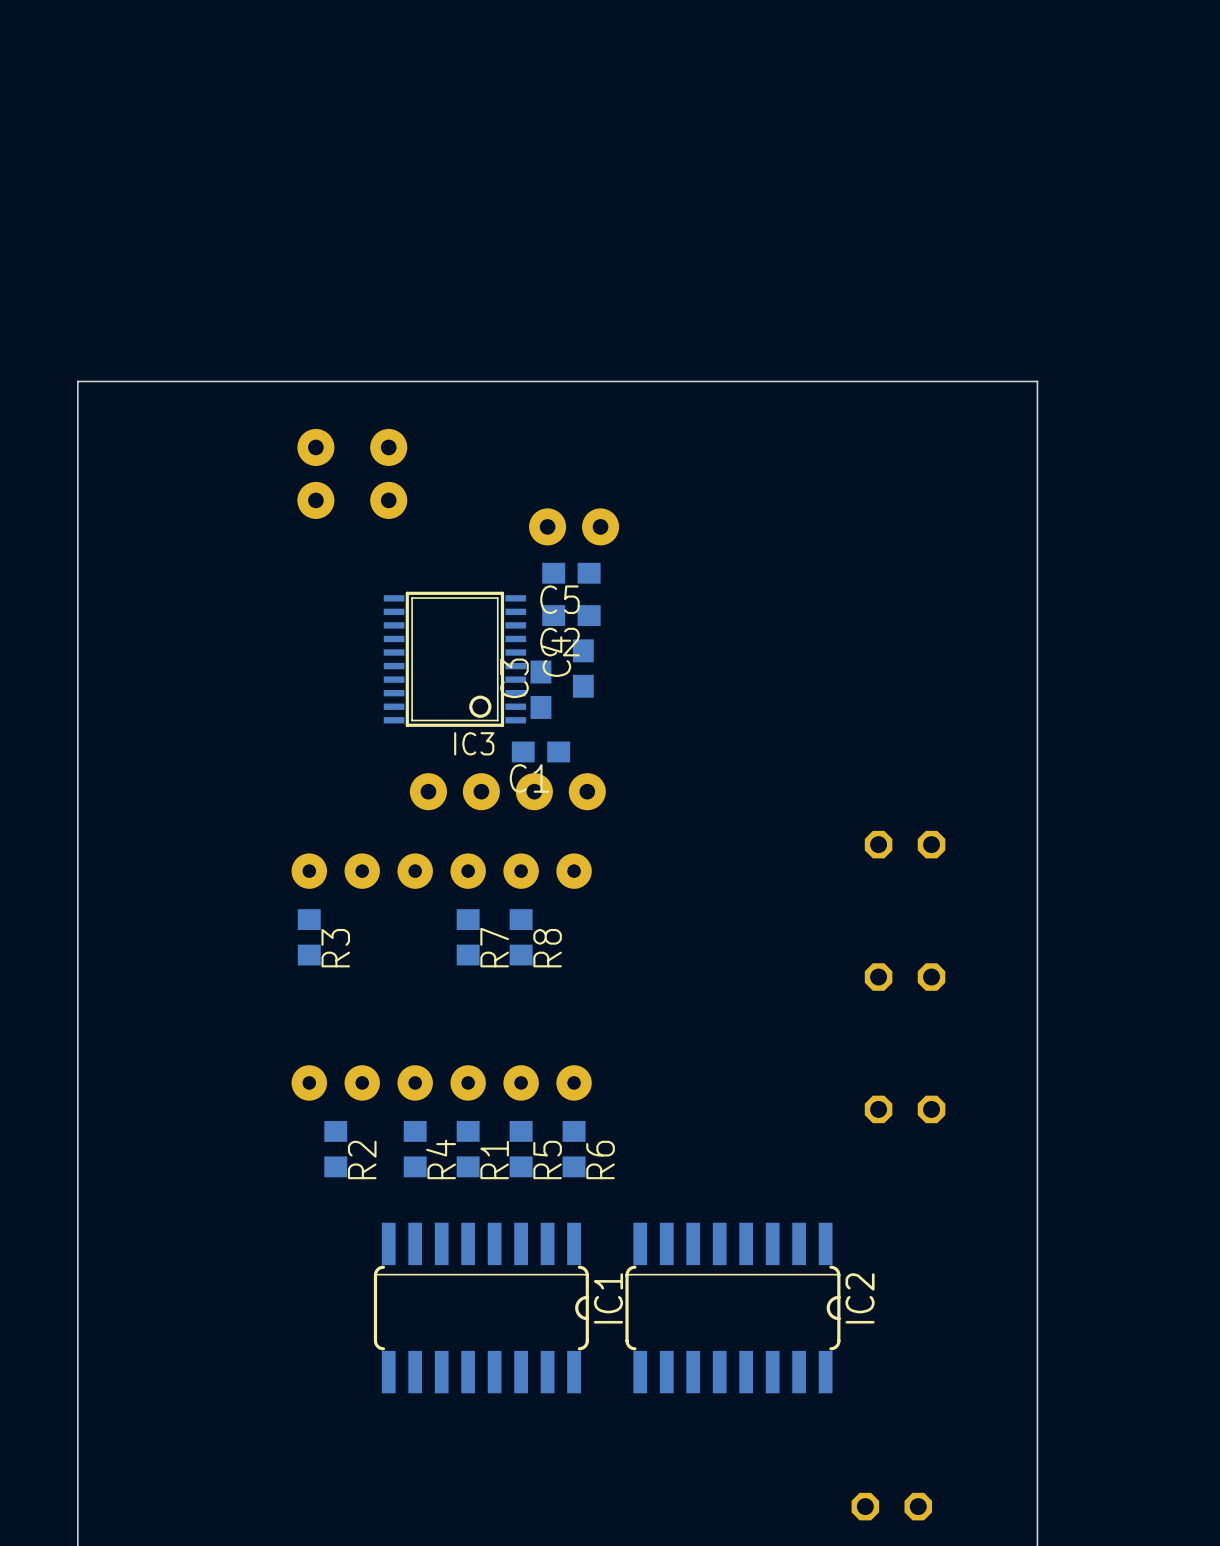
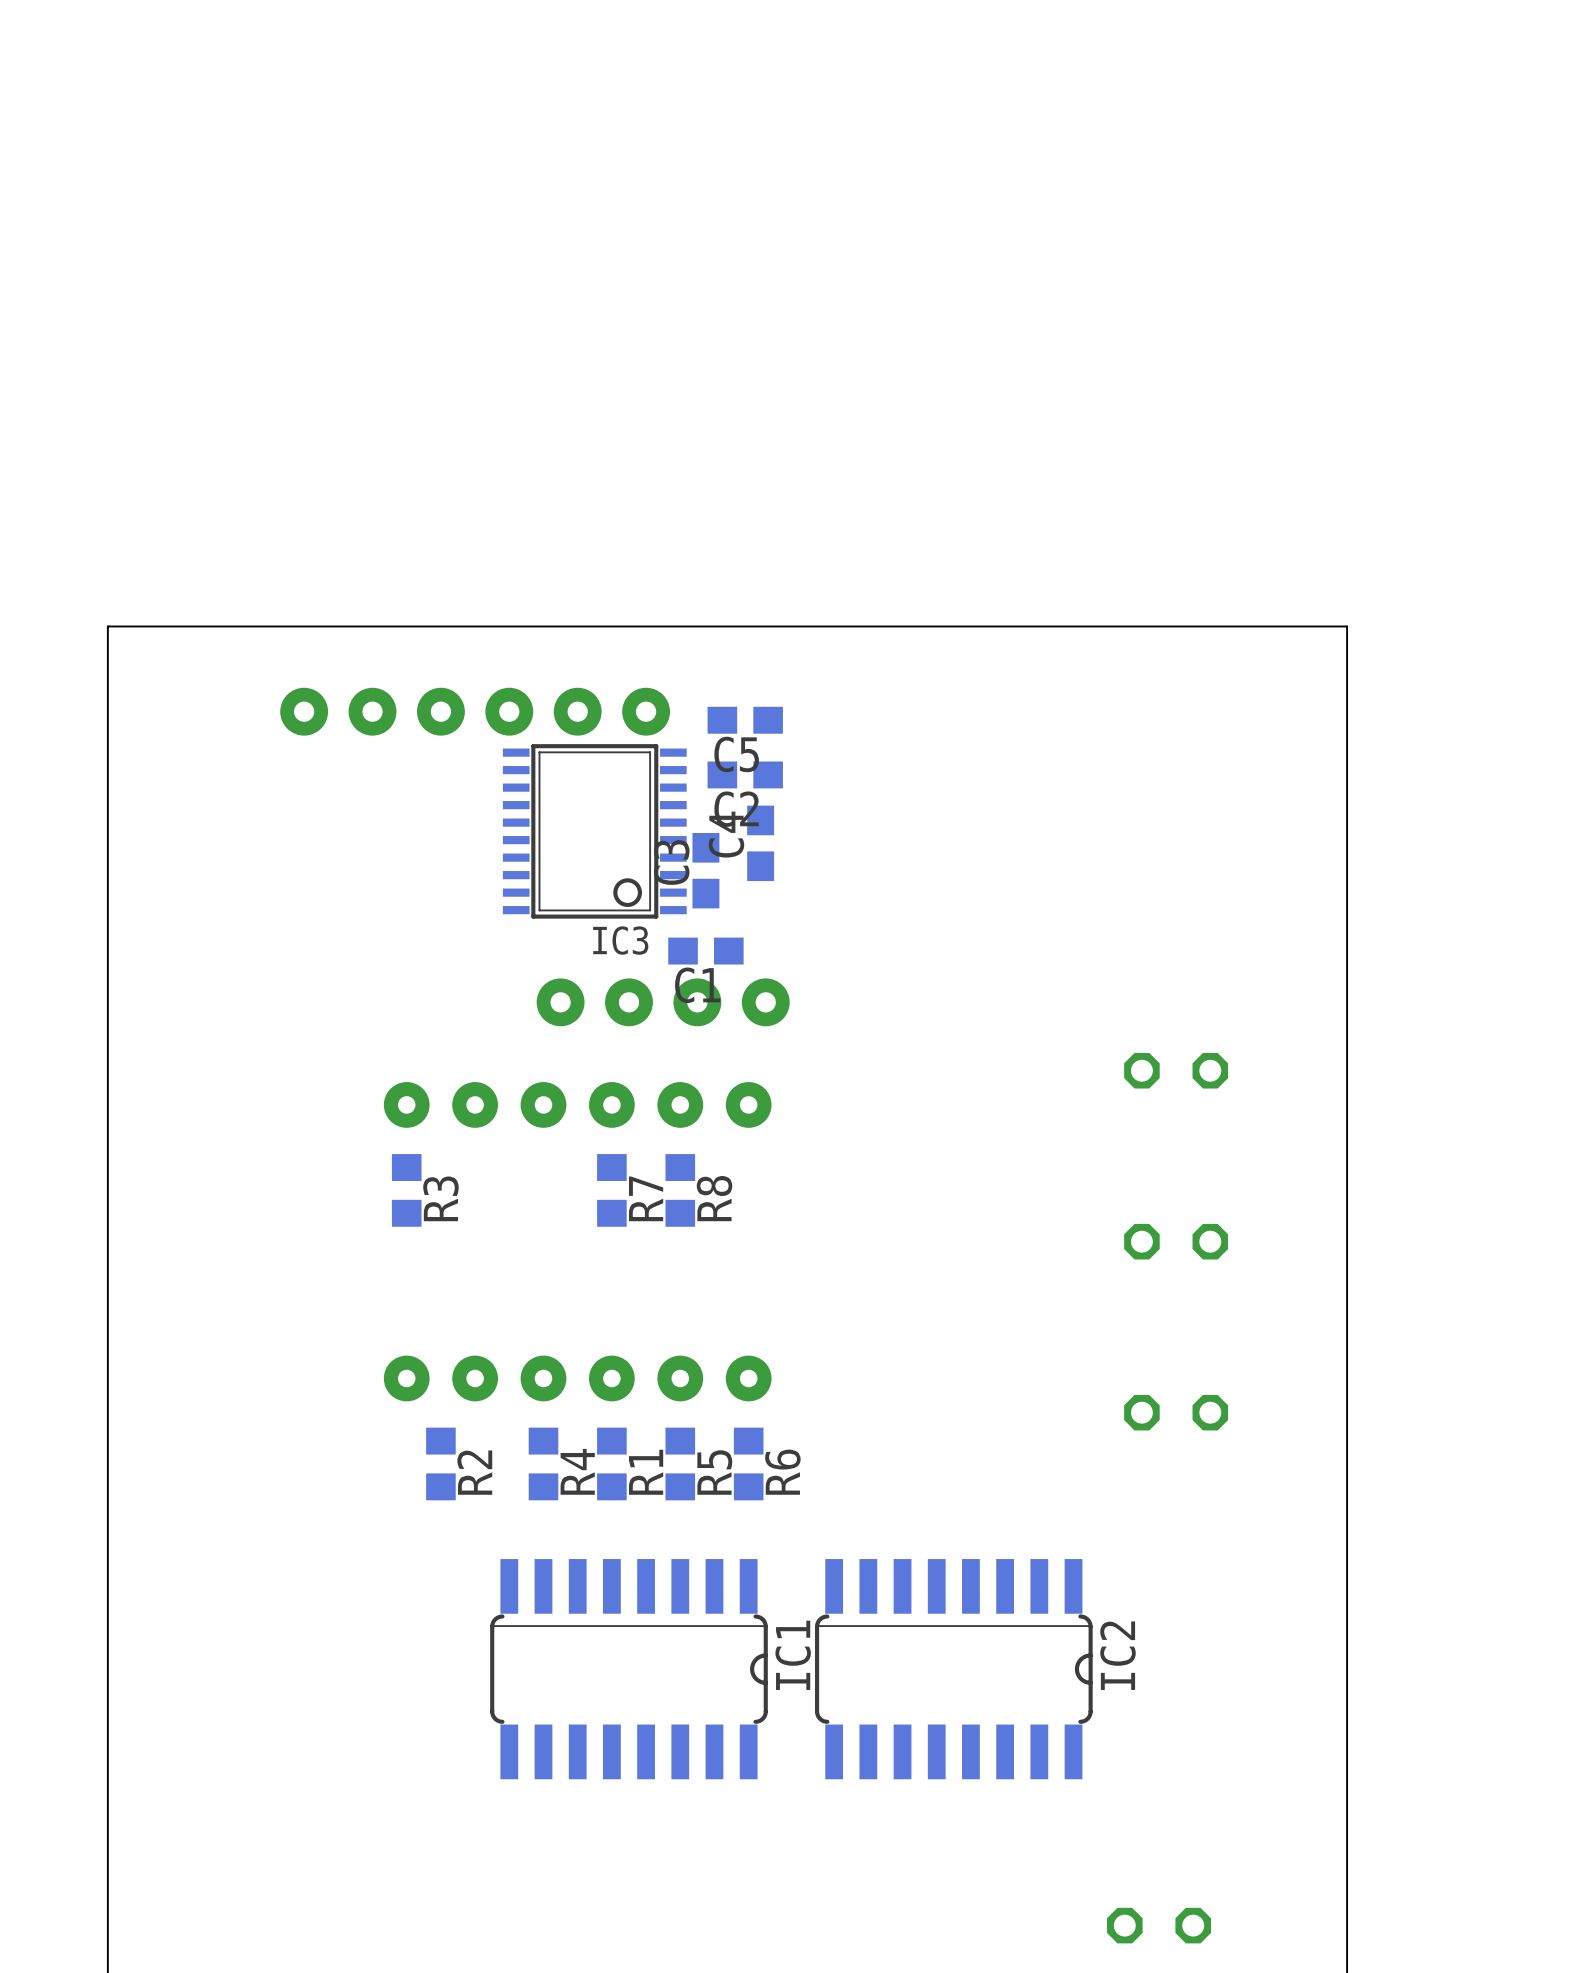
part: (315, 473) -> none
part: (388, 473) -> none
board edge: (1037, 500) (1037, 381) (77, 381) (77, 500) -> (1347, 626) (107, 626)
part: (574, 526) -> none
part: none -> (338, 711)
part: none -> (475, 711)
part: none -> (611, 711)

